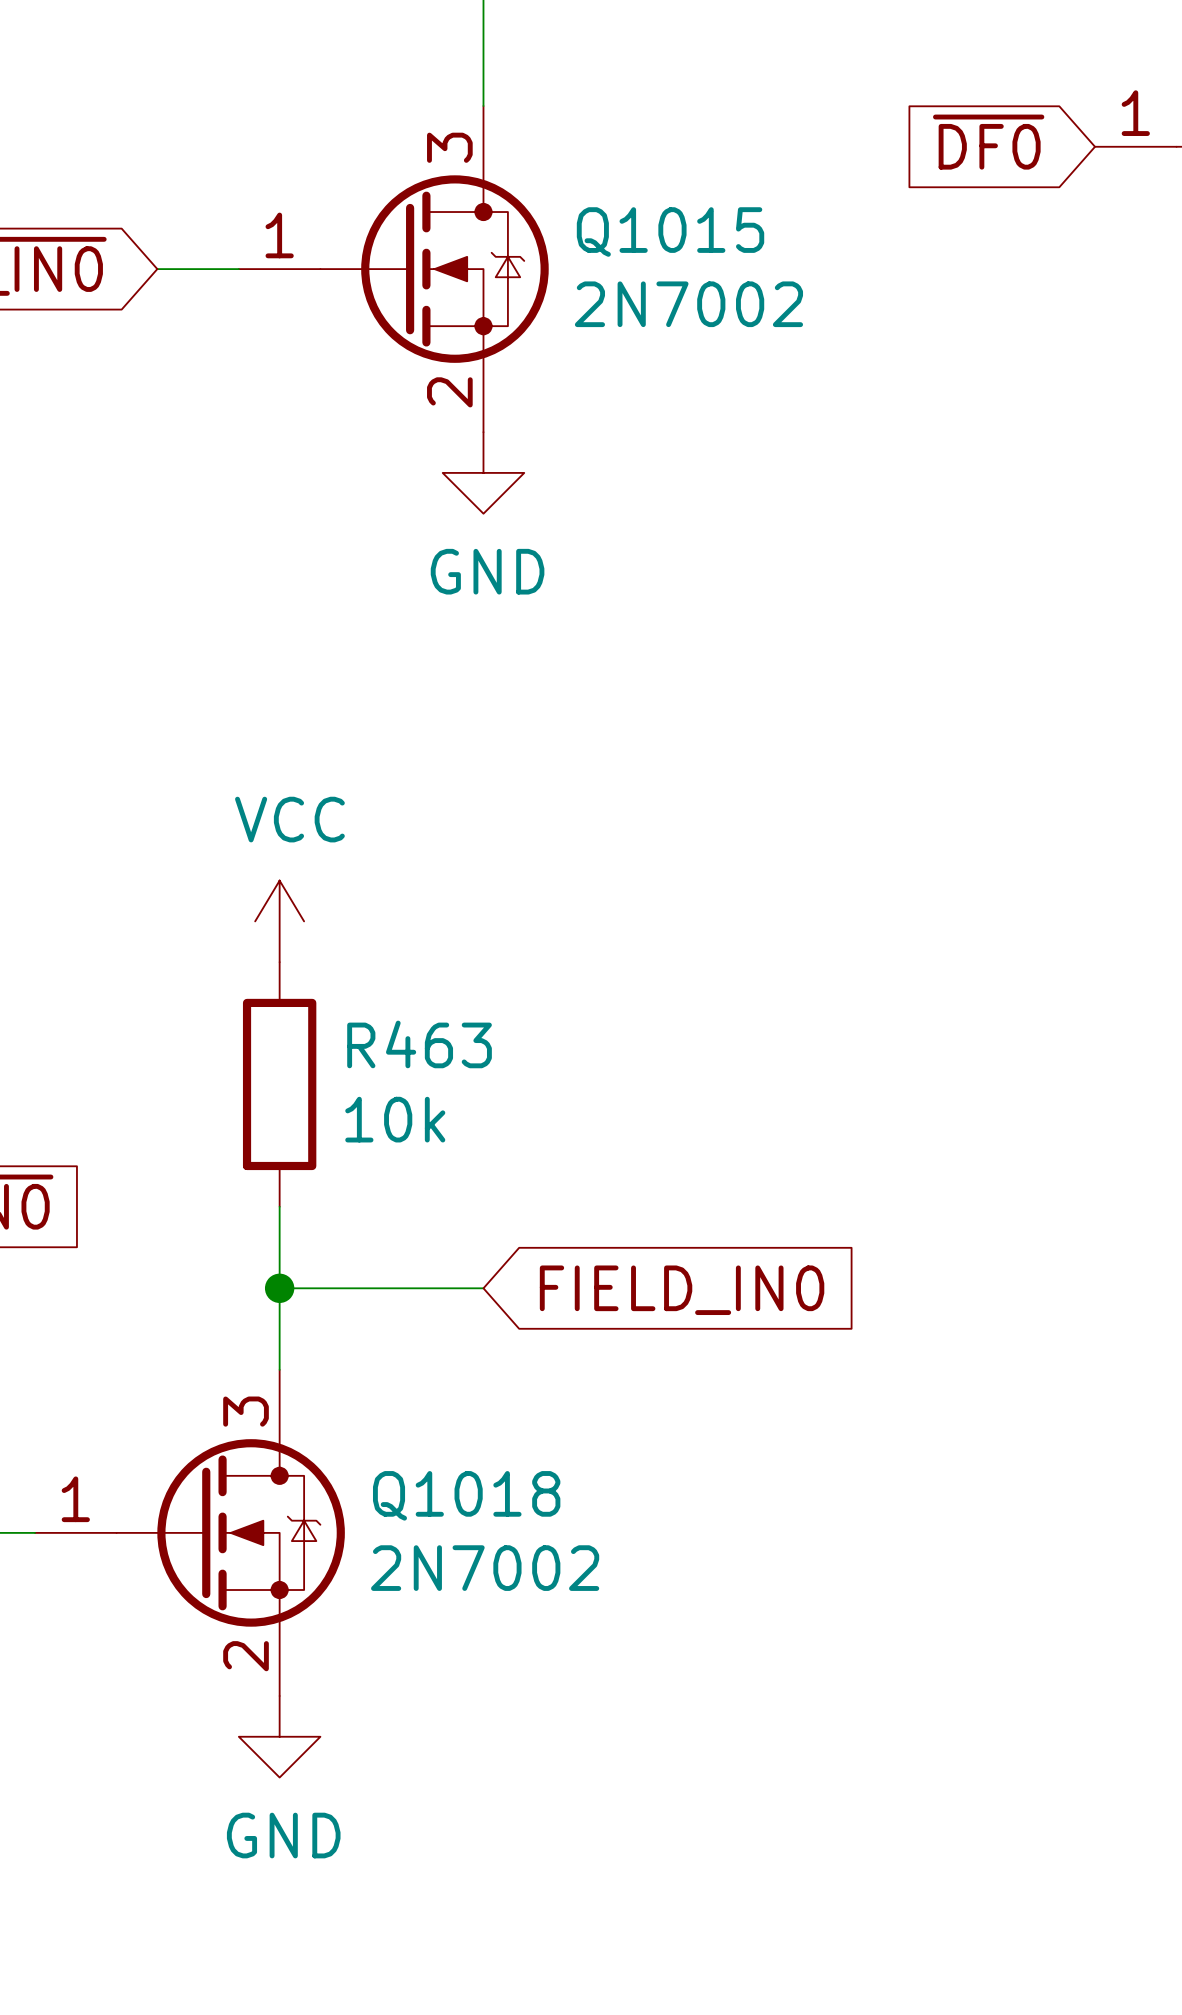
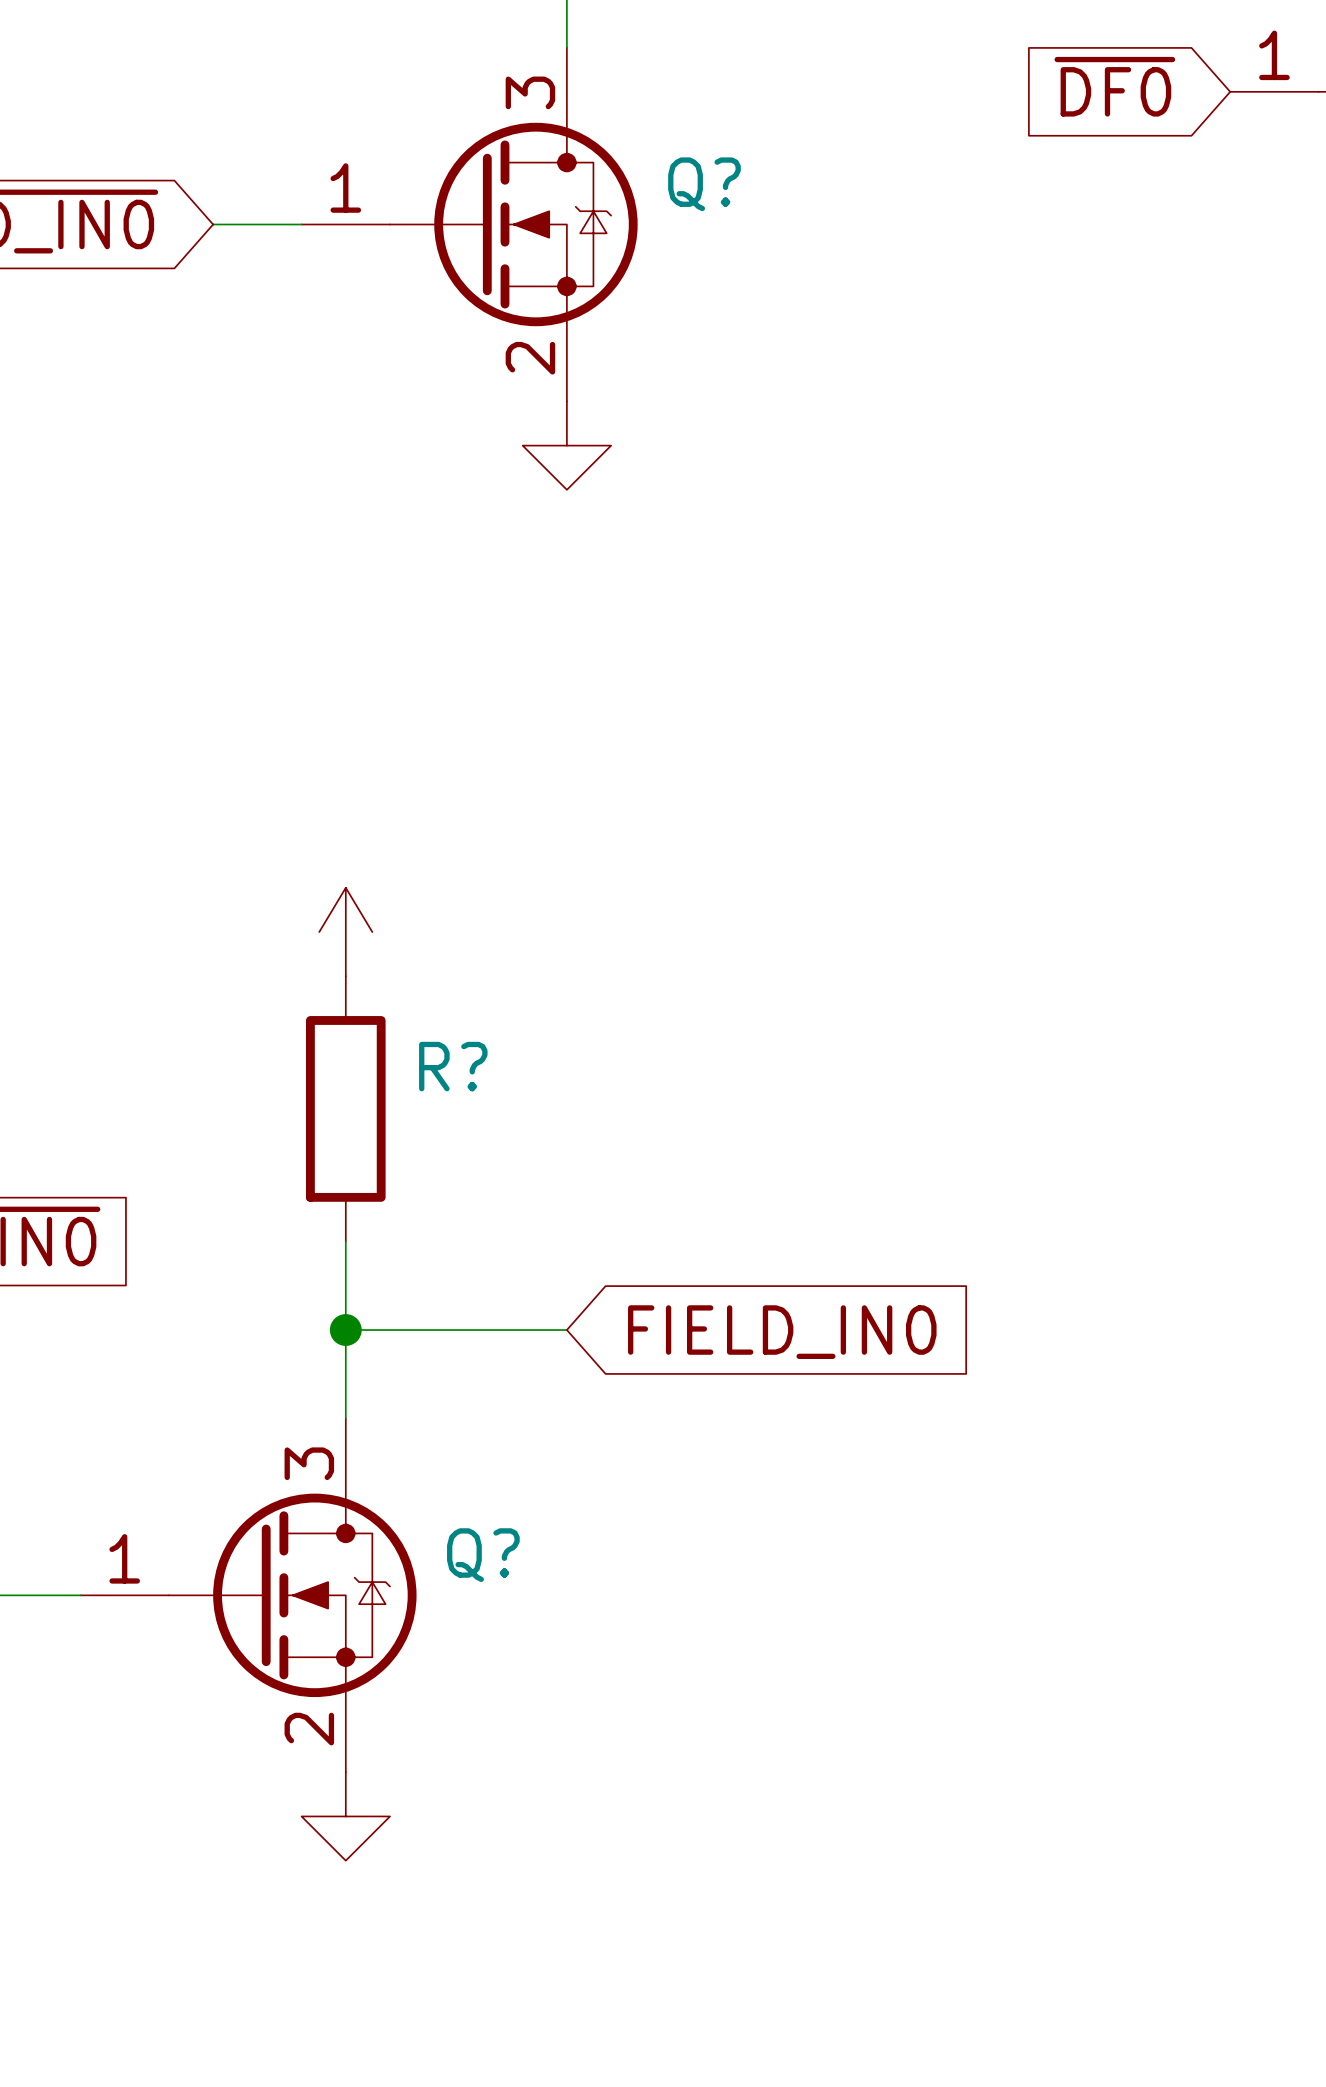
Q1015 name: Q1015 (670, 232) -> Q? (704, 184)
Q1015 value: 2N7002 (688, 304) -> none
power symbol text: GND (487, 571) -> none
power symbol text: VCC (289, 819) -> none
R463 name: R463 (419, 1044) -> R? (453, 1066)
R463 value: 10k (395, 1119) -> none
Q1018 name: Q1018 (466, 1495) -> Q? (483, 1555)
Q1018 value: 2N7002 (485, 1568) -> none
power symbol text: GND (283, 1835) -> none

